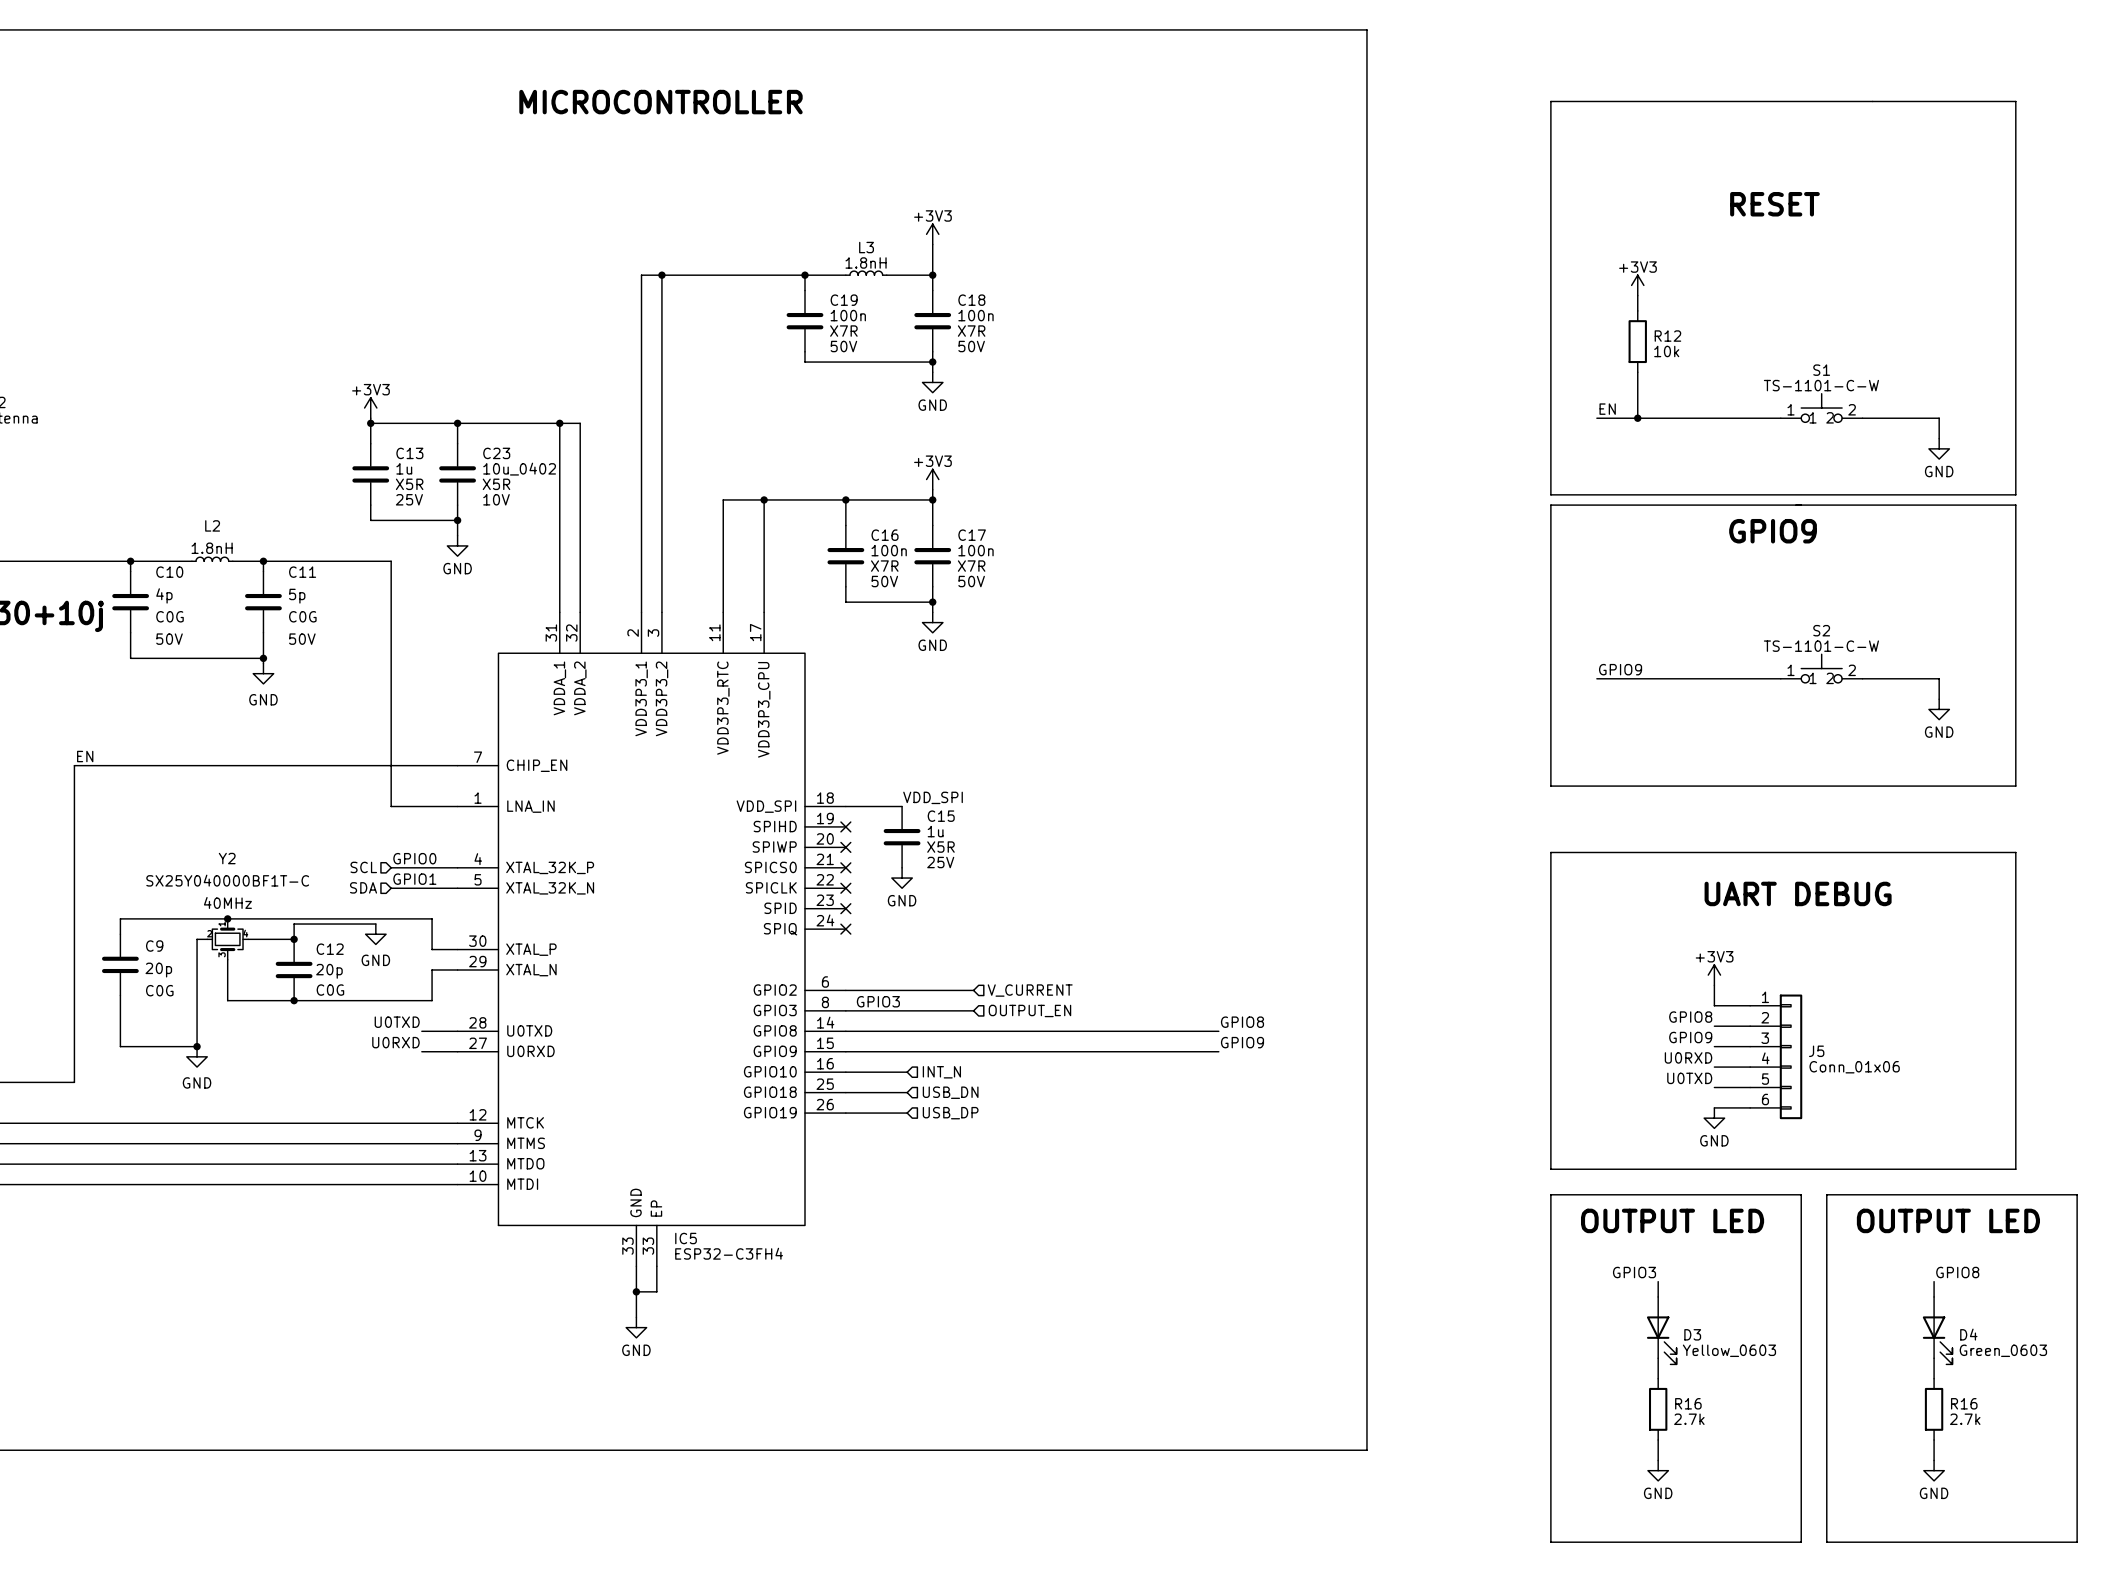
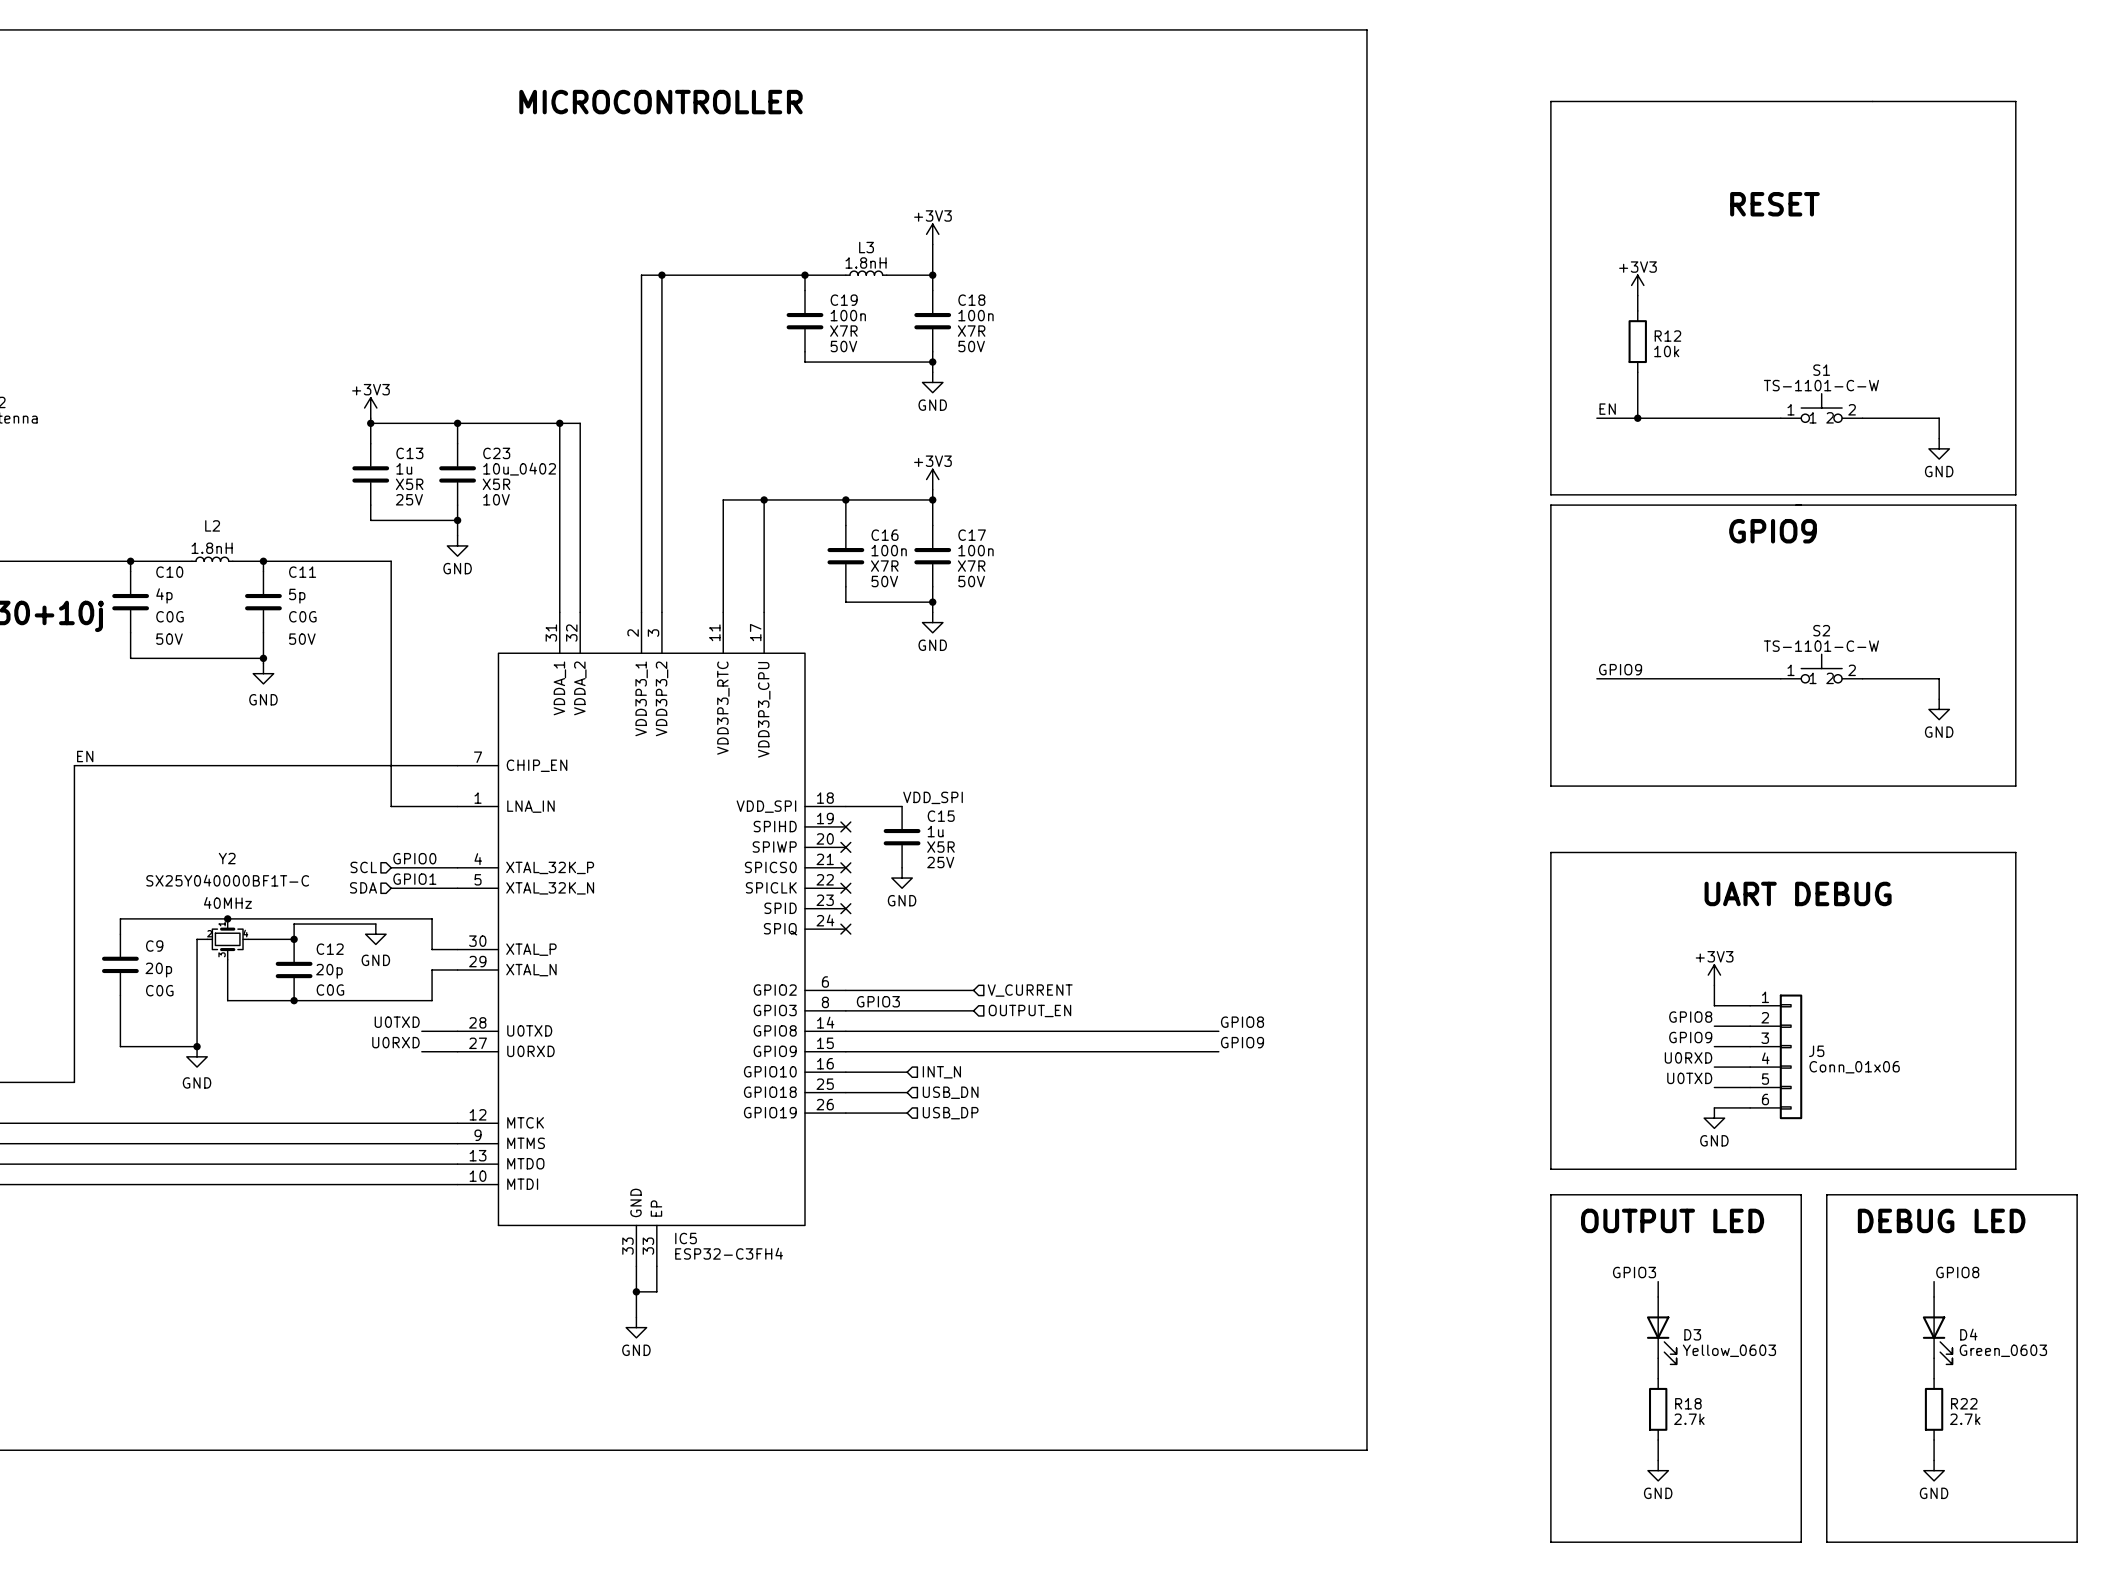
text: OUTPUT LED (1948, 1220) -> DEBUG LED (1941, 1220)
R16 name: R16 (1688, 1403) -> R18 (1688, 1403)
R16 name: R16 (1964, 1403) -> R22 (1964, 1403)

